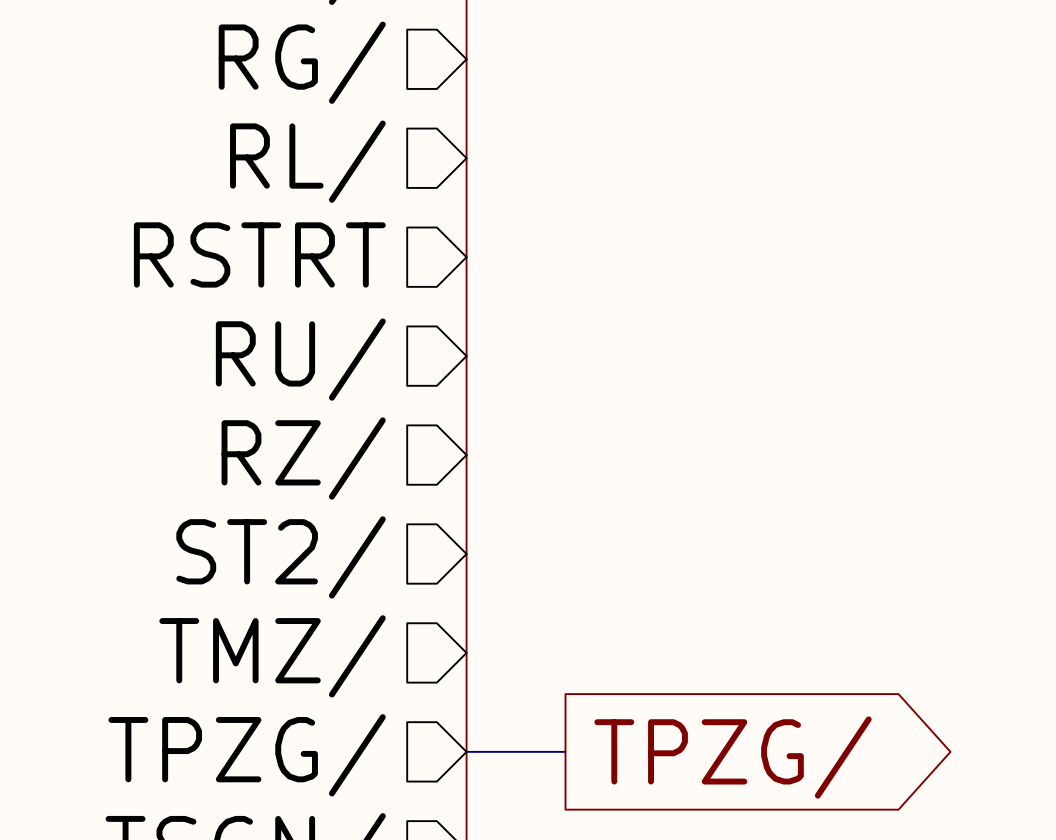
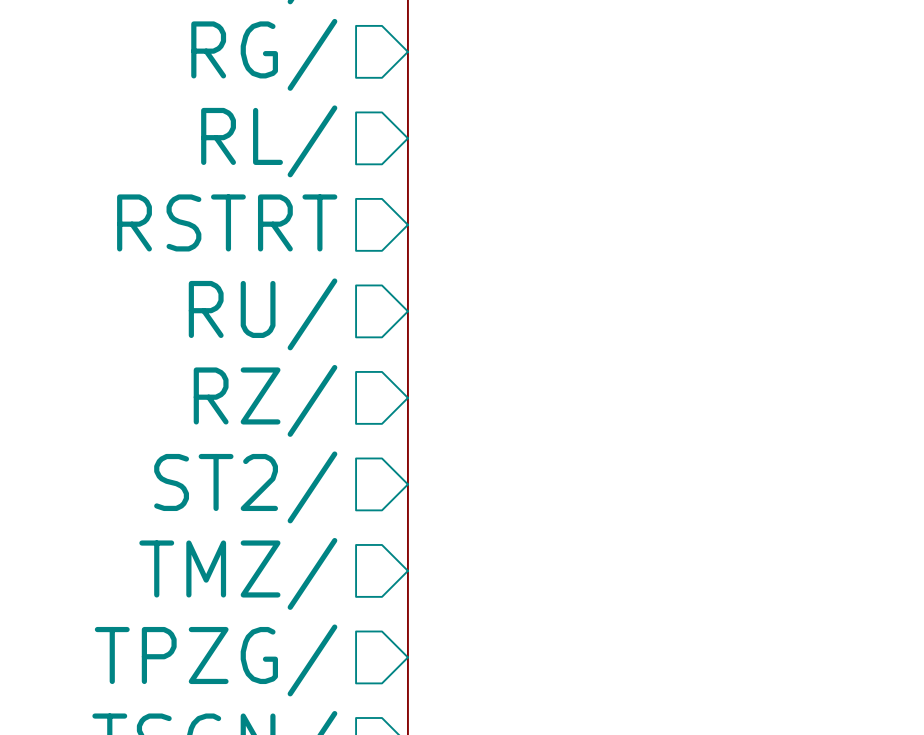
wire: (466, 751) (565, 751) -> none
global label: TPZG/ (733, 757) -> none

